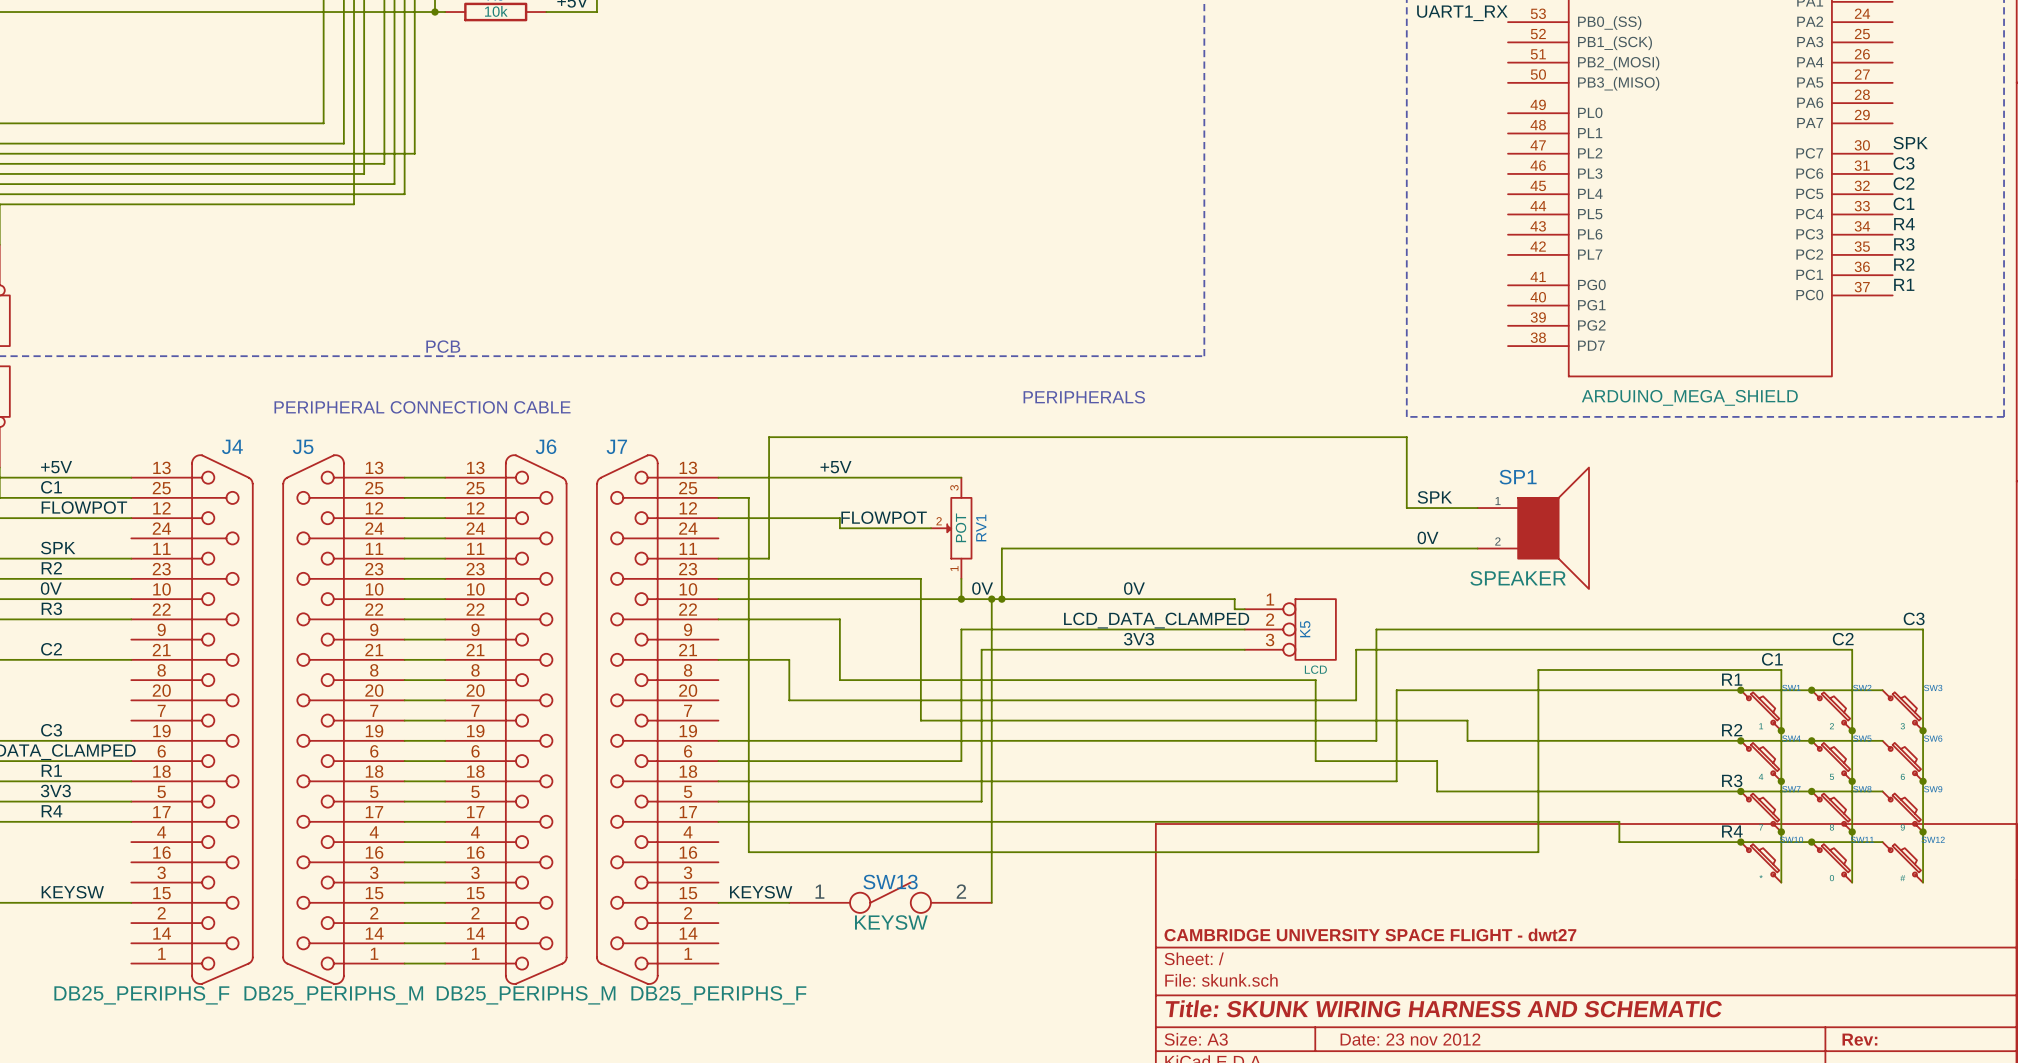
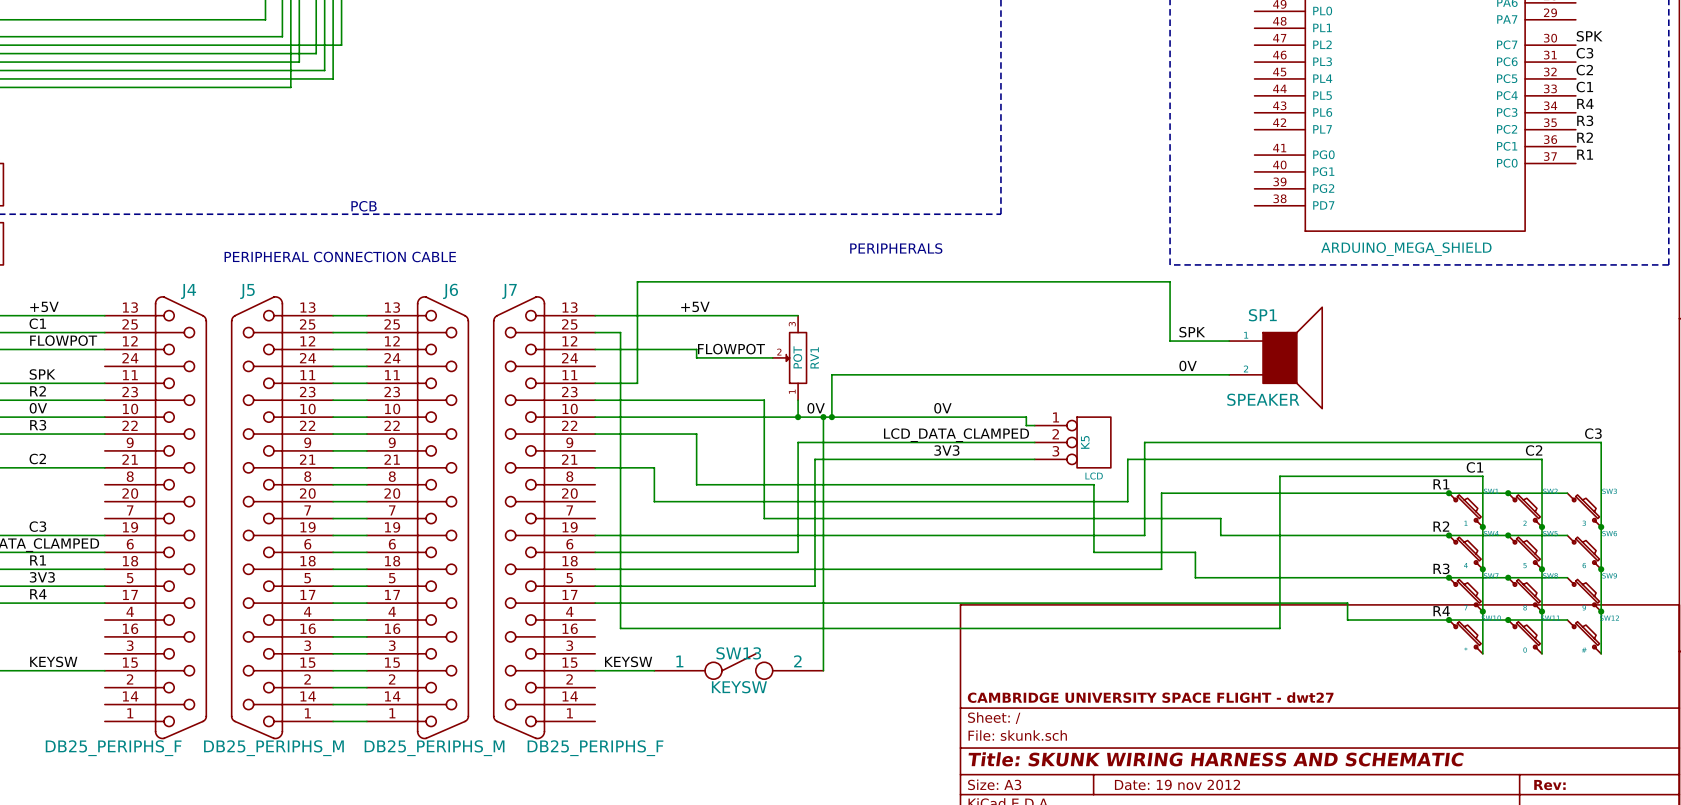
title block: Date: 23 nov 2012 (1410, 1039) -> Date: 19 nov 2012 (1177, 784)

